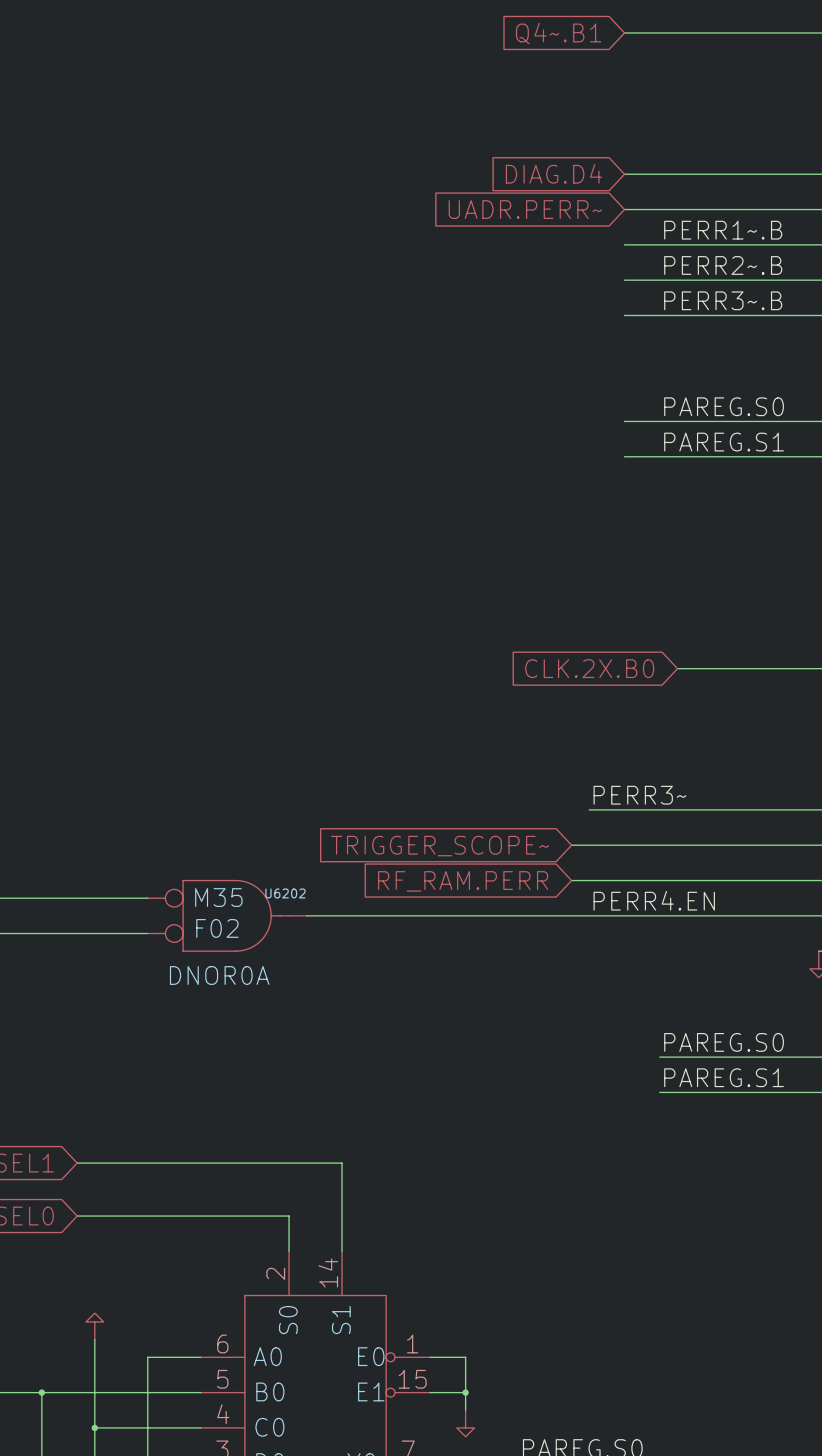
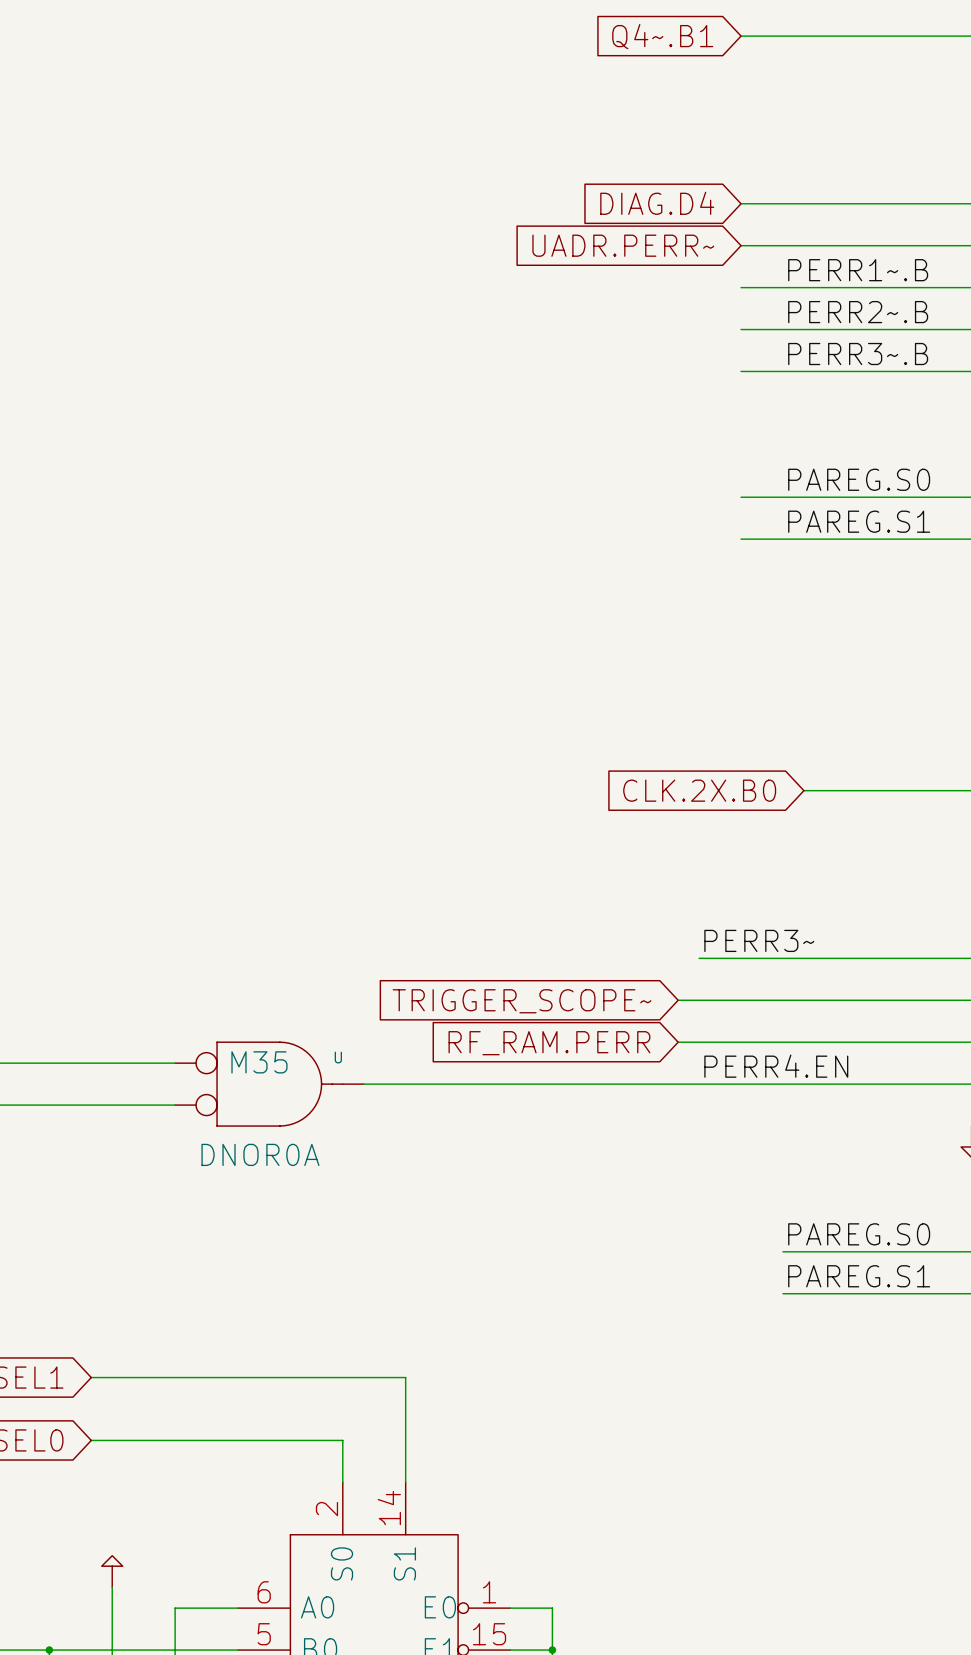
U6202 name: U6202 (285, 893) -> U (338, 1057)
U6202 value: F02 (217, 928) -> none

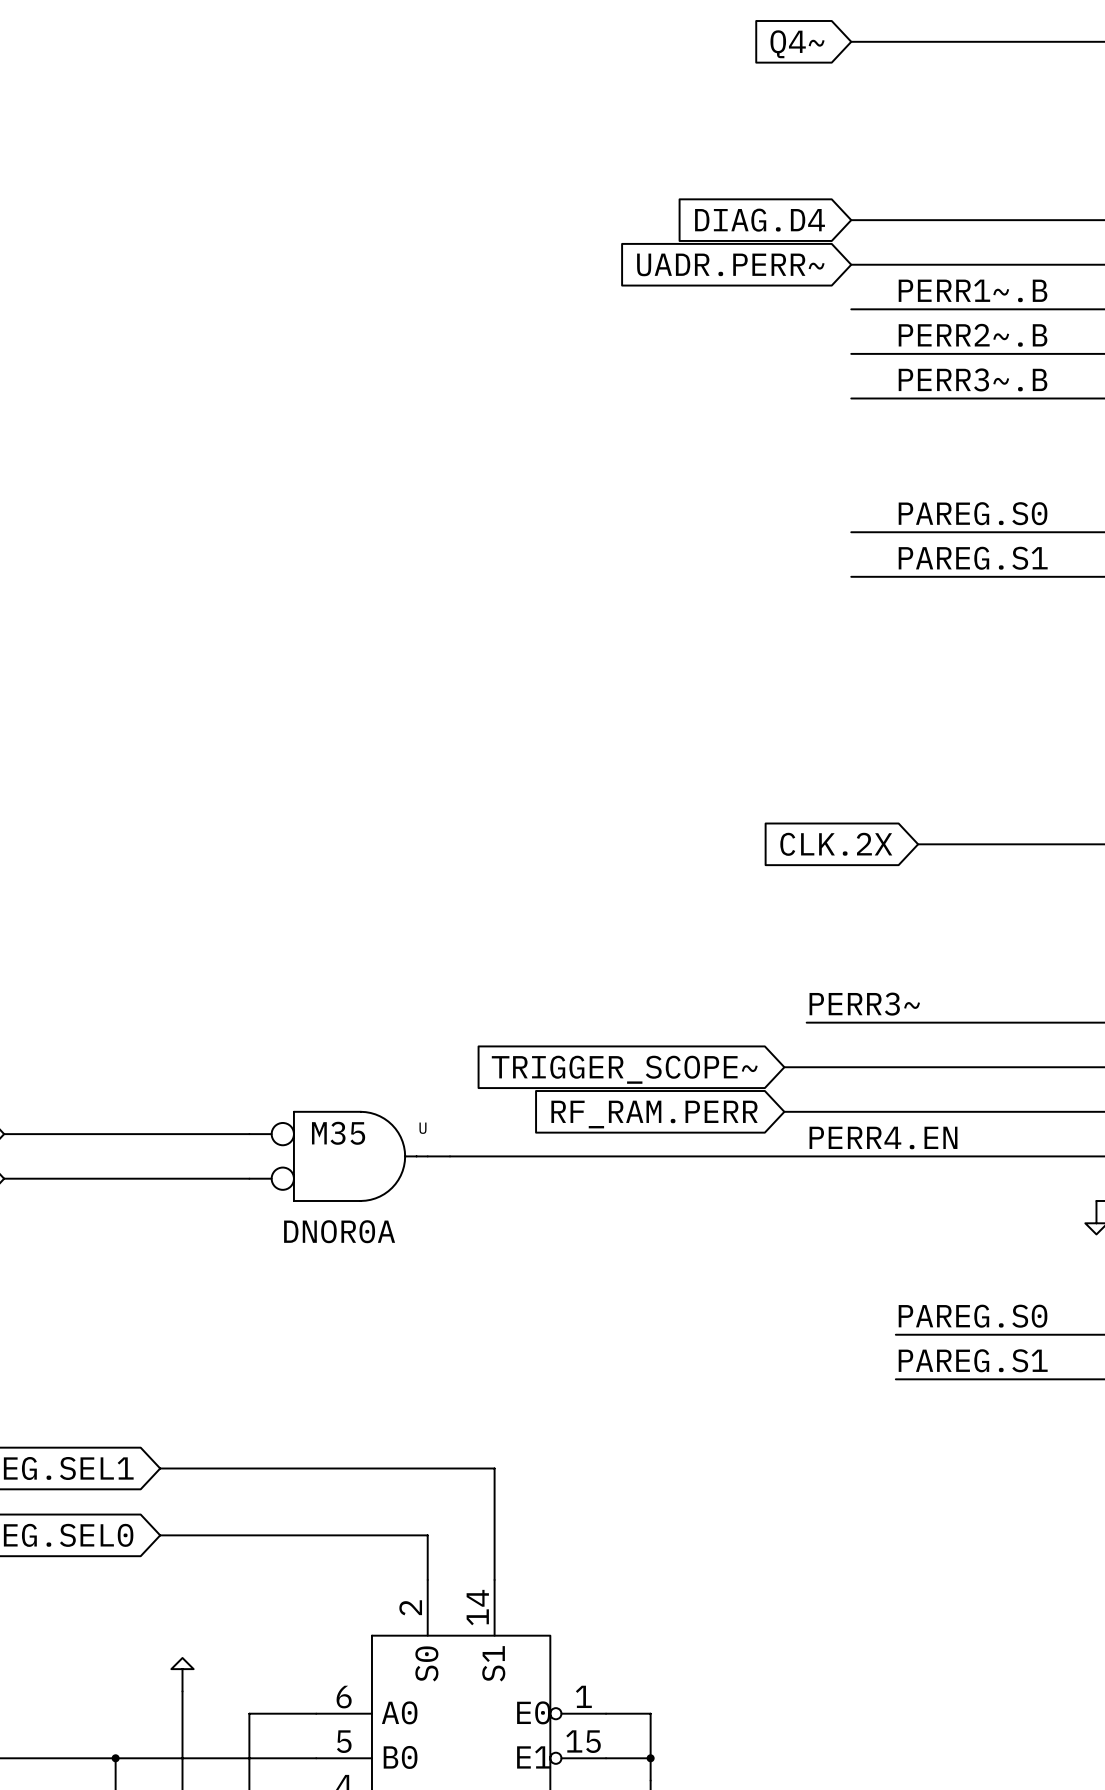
global label: Q4~.B1 (662, 36) -> Q4~ (797, 44)
global label: CLK.2X.B0 (699, 790) -> CLK.2X (836, 844)

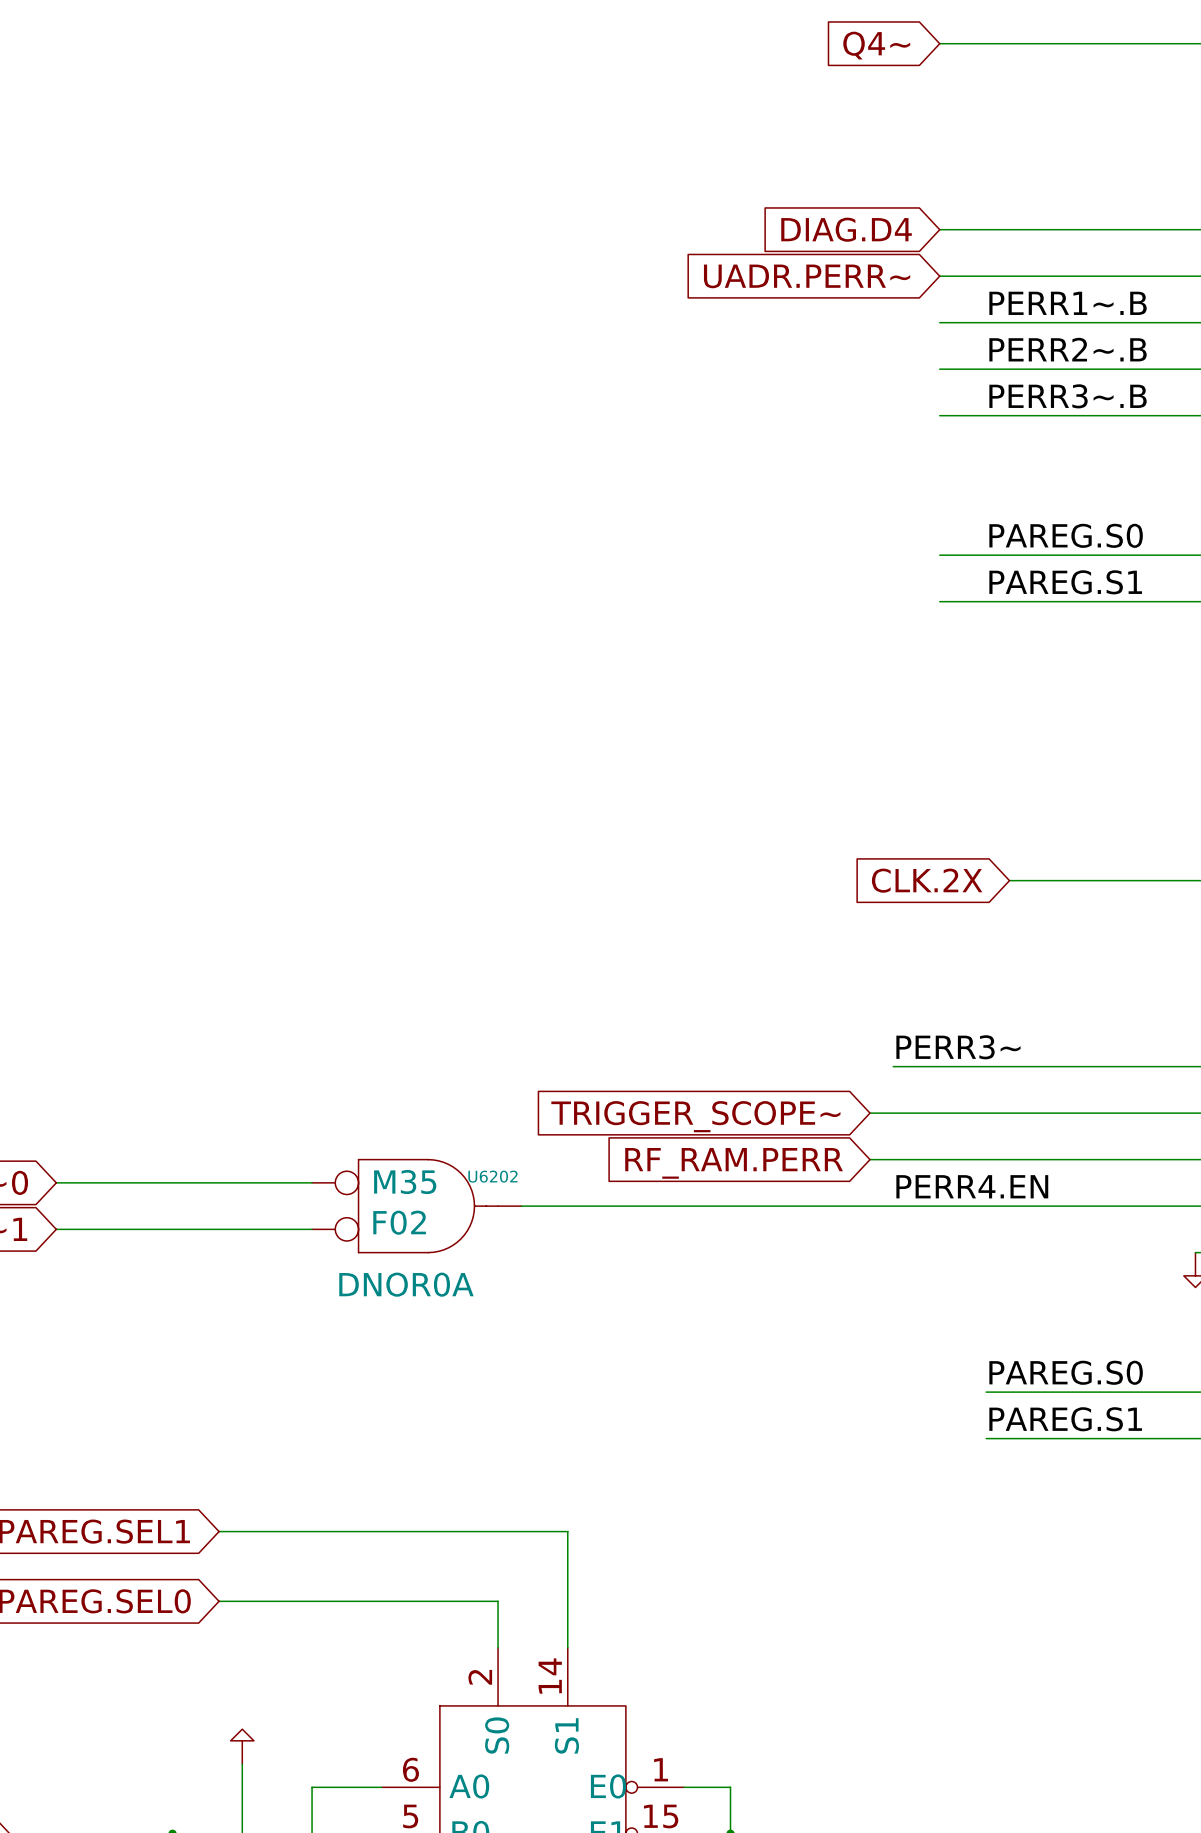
U name: U (422, 1128) -> U6202 (492, 1176)
U value: none -> F02 (399, 1222)

